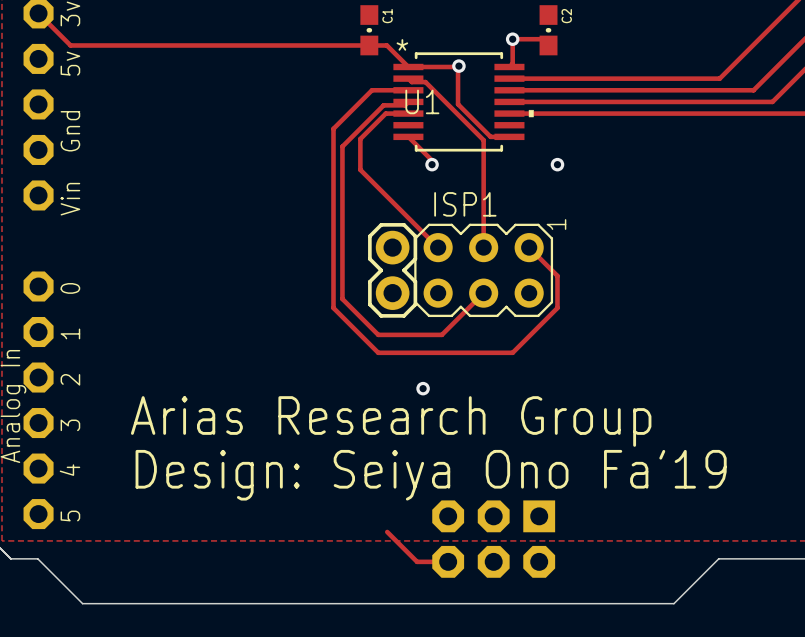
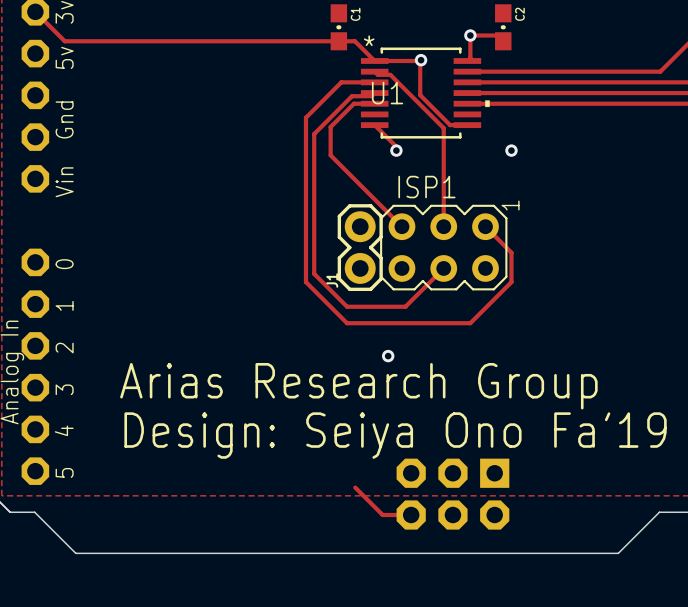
J1 name: none -> J1 (332, 280)

